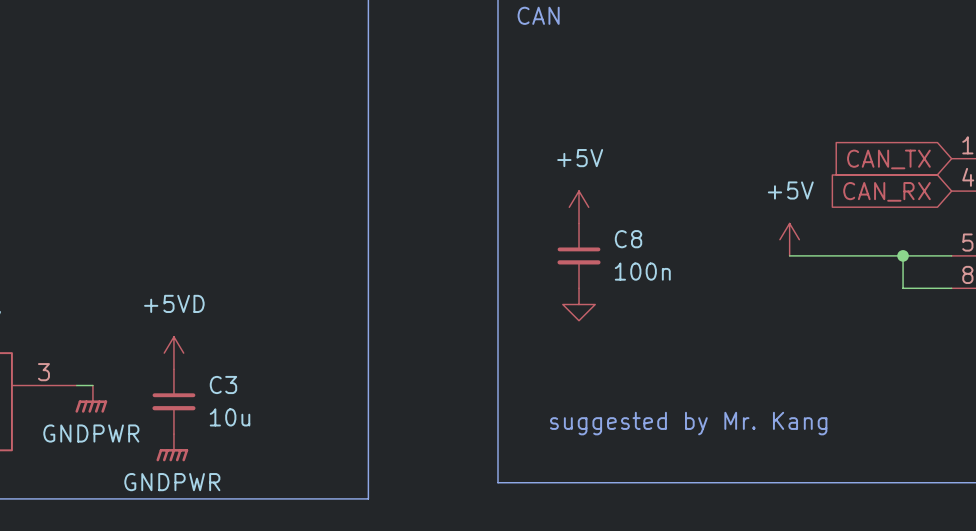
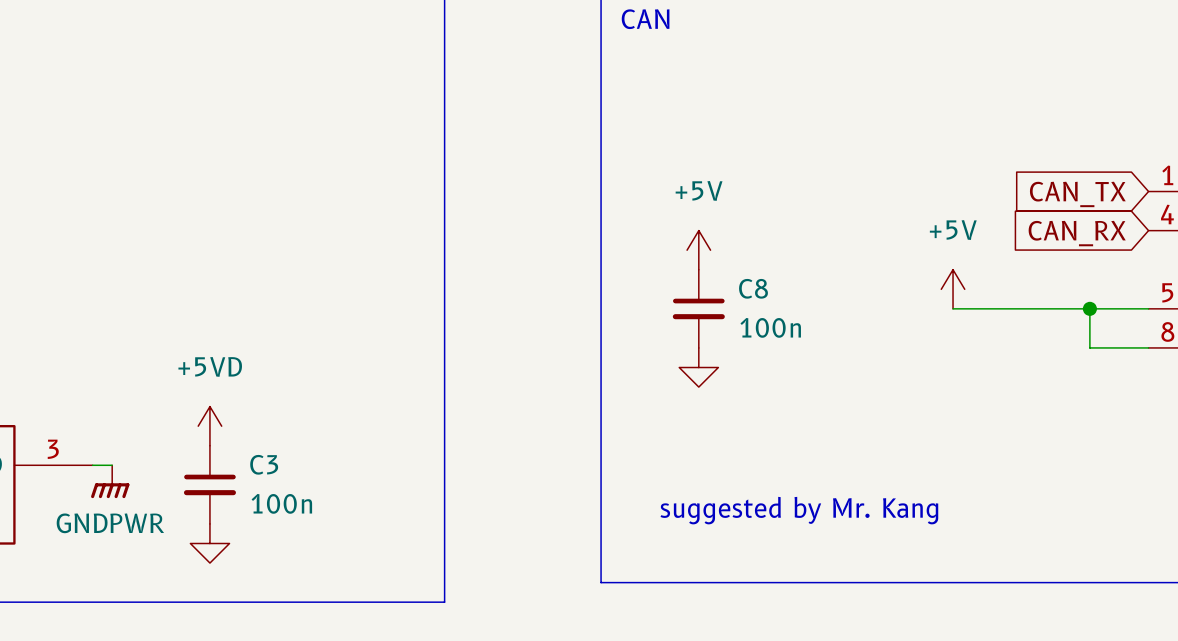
C3 value: 10u (230, 417) -> 100n (281, 503)
power symbol shape: [156, 434, 189, 462] -> [190, 523, 230, 564]
power symbol text: GNDPWR (172, 482) -> none

